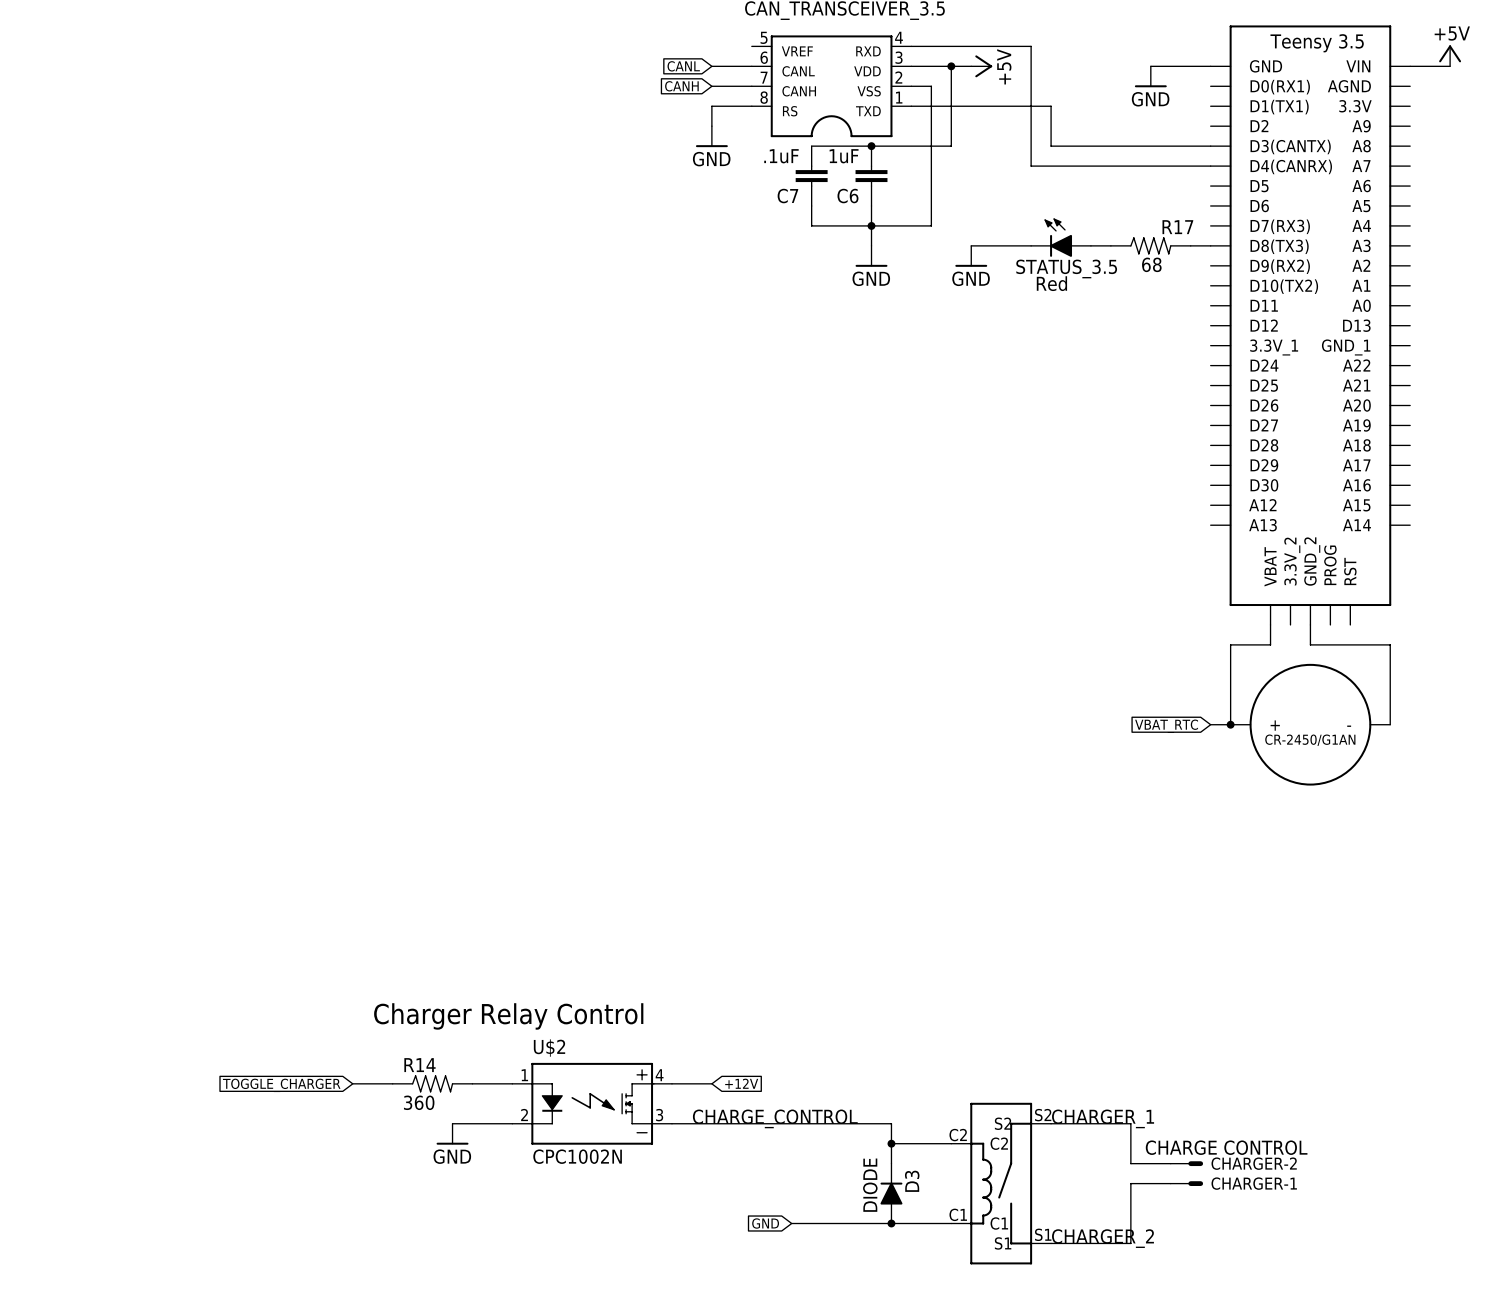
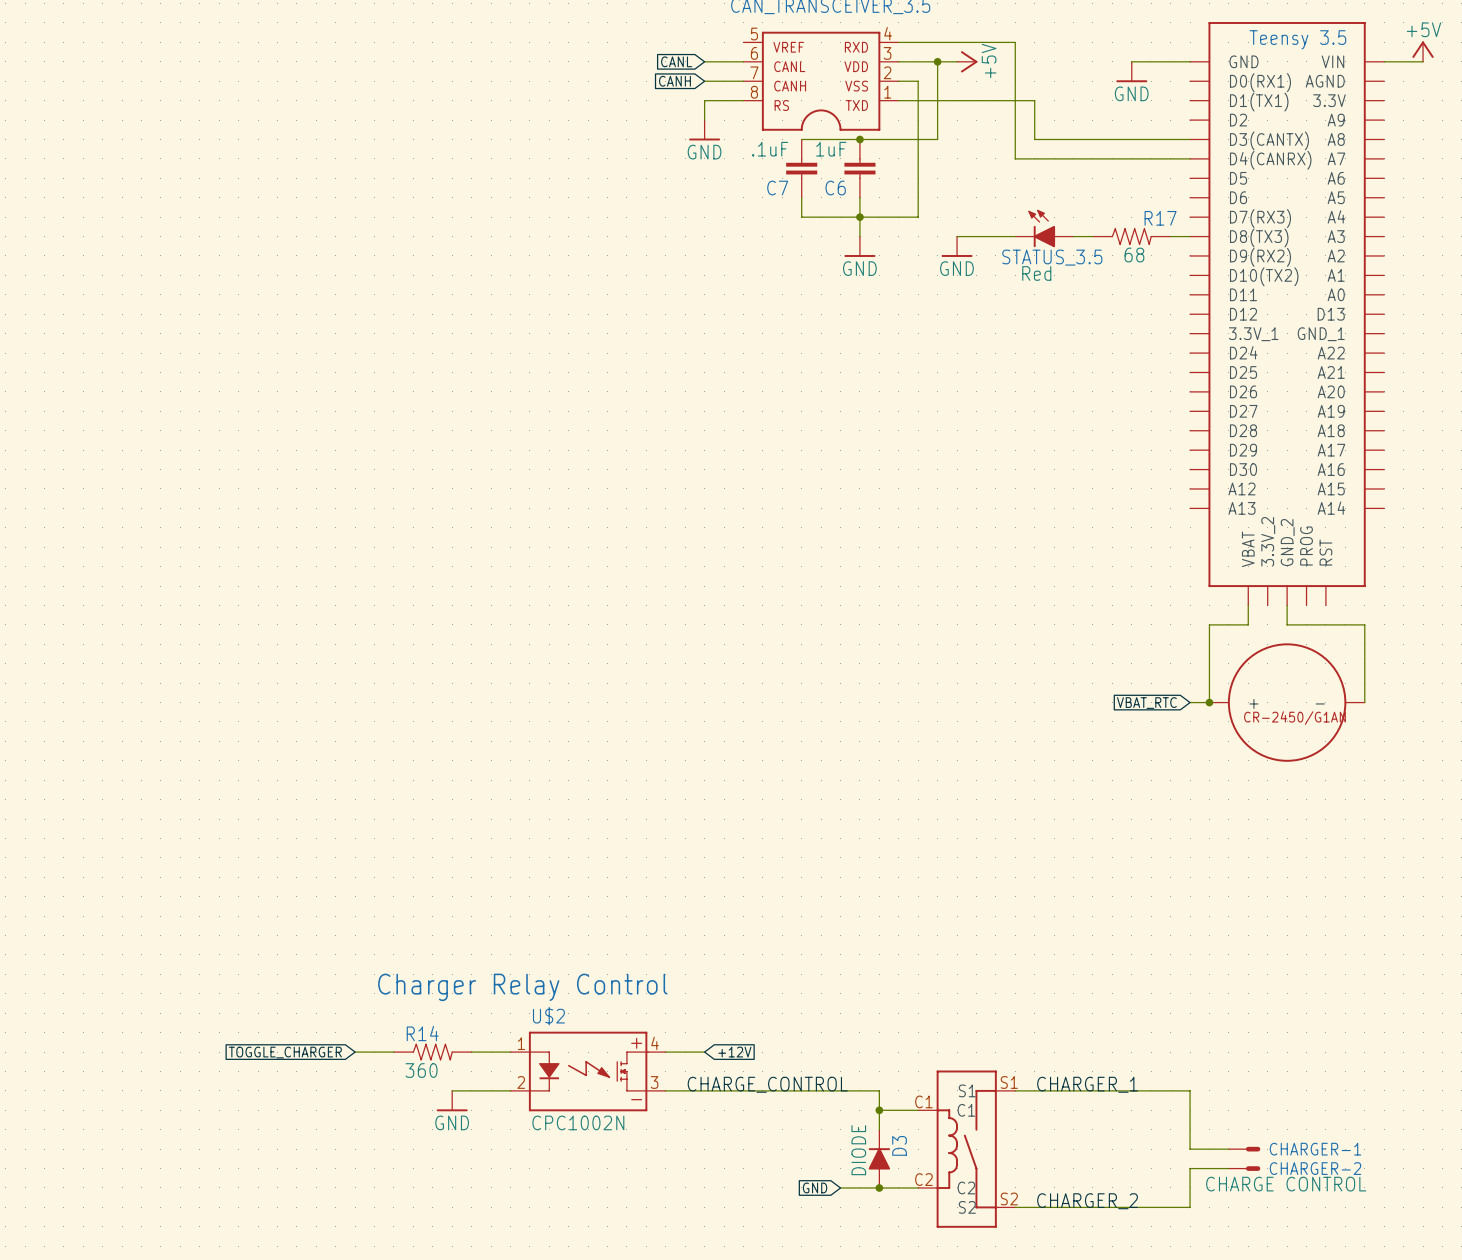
wire: (1130, 1123) (1130, 1163) (1170, 1163) -> (1112, 1090) (1190, 1090) (1190, 1149) (1228, 1149)
CHARGER-1 value position: CHARGE CONTROL (1226, 1147) -> CHARGE CONTROL (1286, 1184)
CHARGER-2 position: (1186, 1163) -> (1244, 1168)
part: none -> (966, 1149)
part: (1001, 1183) -> none
wire: (1170, 1183) (1130, 1183) (1130, 1243) -> (1228, 1168) (1190, 1168) (1190, 1207) (1112, 1207)
CHARGER-1 position: (1186, 1183) -> (1244, 1149)
global label position: GND (765, 1223) -> GND (815, 1187)
wire: (791, 1223) (851, 1223) -> none

